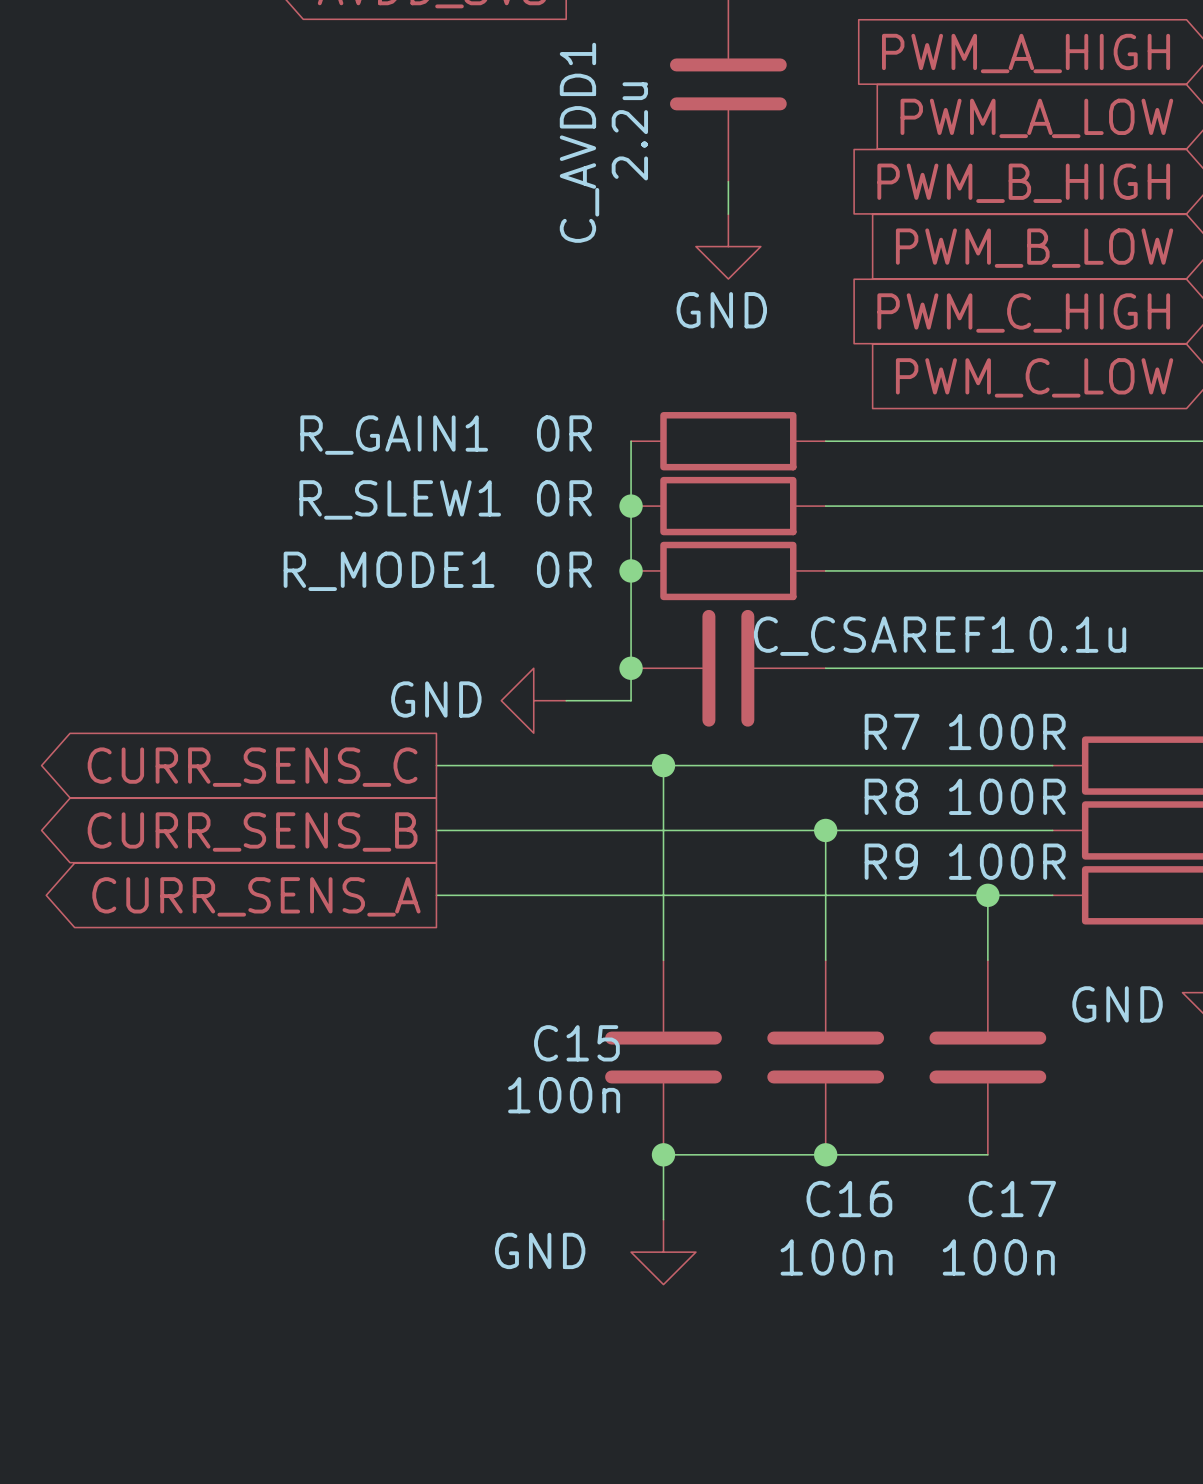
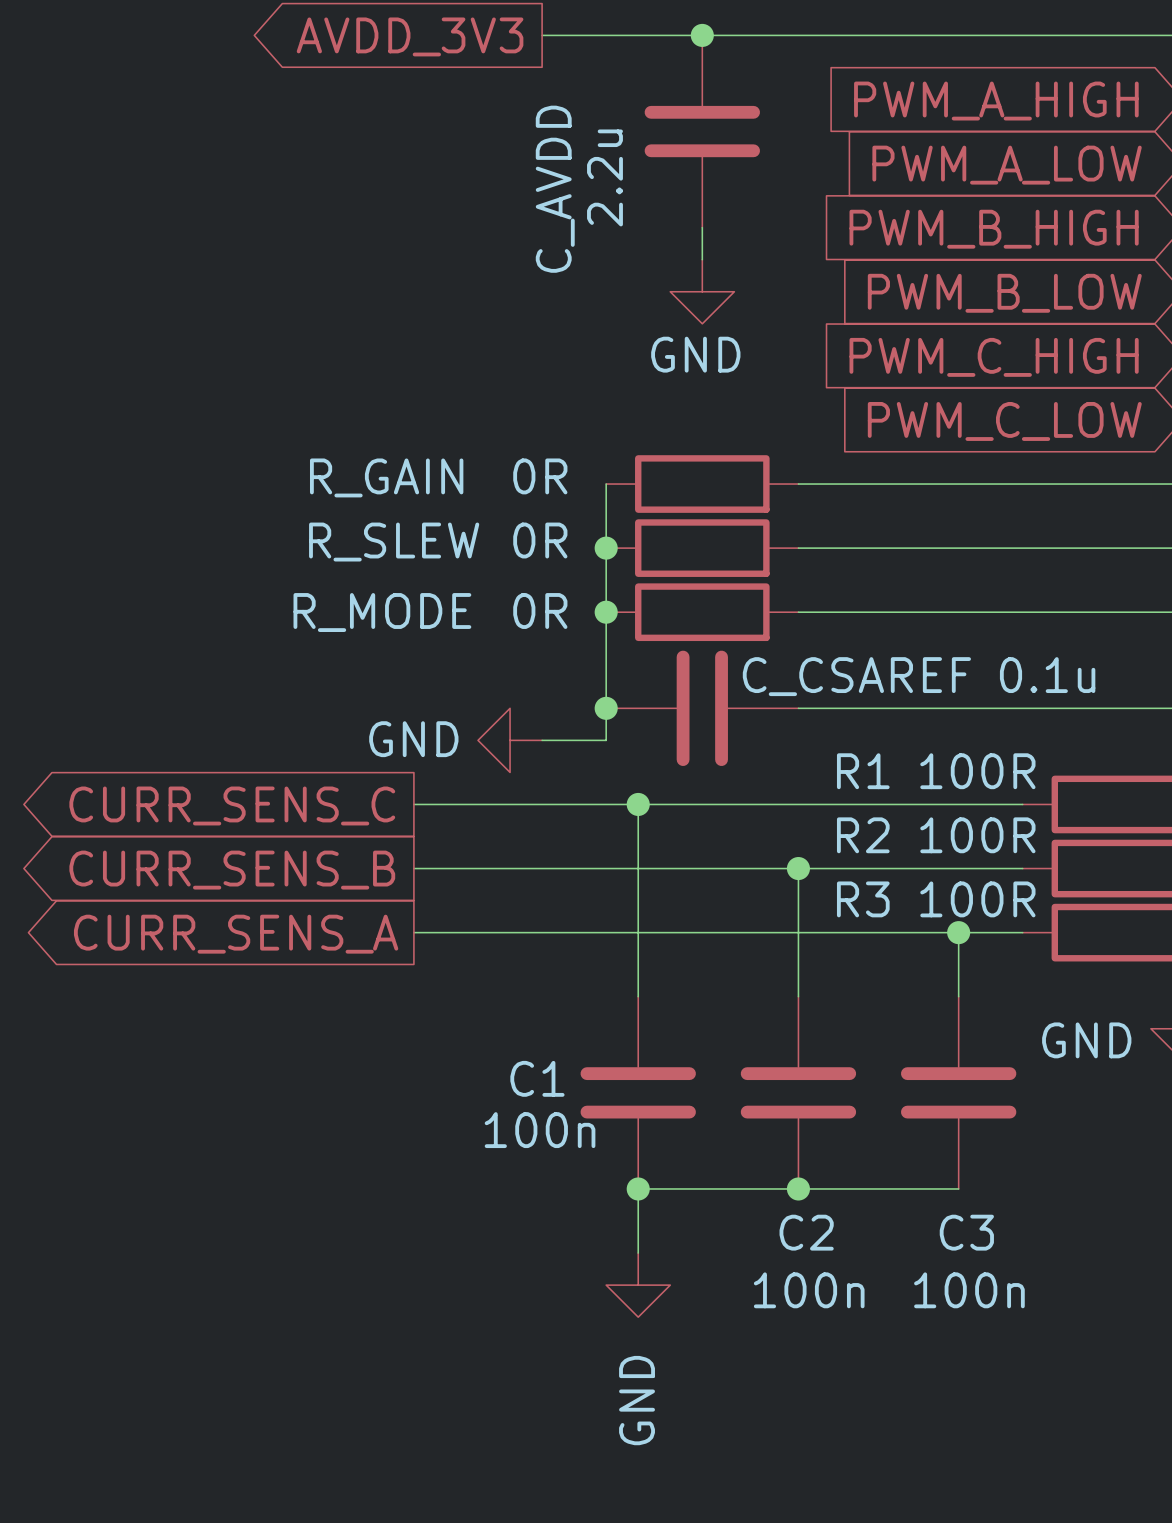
C_AVDD1 name: C_AVDD1 (579, 142) -> C_AVDD (555, 189)
R_GAIN1 name: R_GAIN1 (394, 435) -> R_GAIN (386, 477)
R_SLEW1 name: R_SLEW1 (400, 499) -> R_SLEW (394, 542)
R_MODE1 name: R_MODE1 (389, 571) -> R_MODE (382, 612)
C_CSAREF1 name: C_CSAREF1 (884, 636) -> C_CSAREF (856, 676)
R7 name: R7 (892, 731) -> R1 (863, 771)
R8 name: R8 (891, 796) -> R2 (863, 835)
R9 name: R9 (891, 861) -> R3 (863, 899)
C15 name: C15 (576, 1043) -> C1 (537, 1078)
C16 name: C16 (849, 1199) -> C2 (806, 1232)
C17 name: C17 (1012, 1199) -> C3 (966, 1232)
power symbol text rotation: 0° (540, 1250) -> 90° counterclockwise (637, 1400)
power symbol text position: GND (540, 1250) -> GND (637, 1400)

